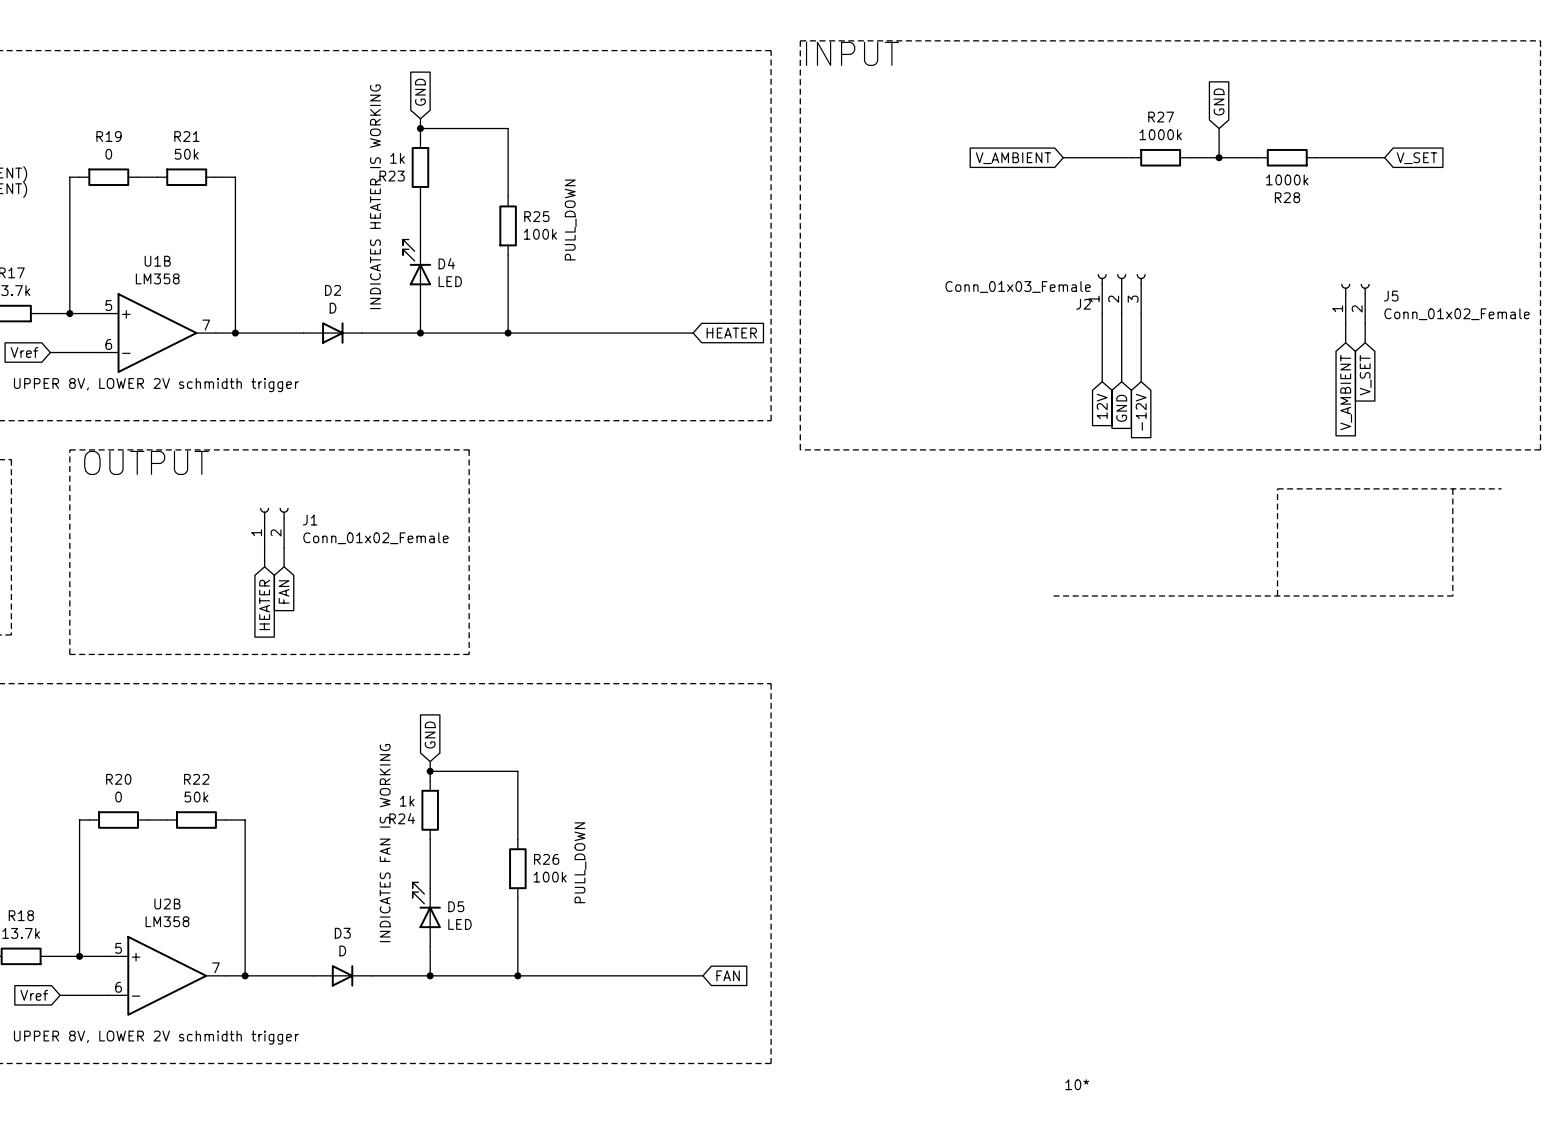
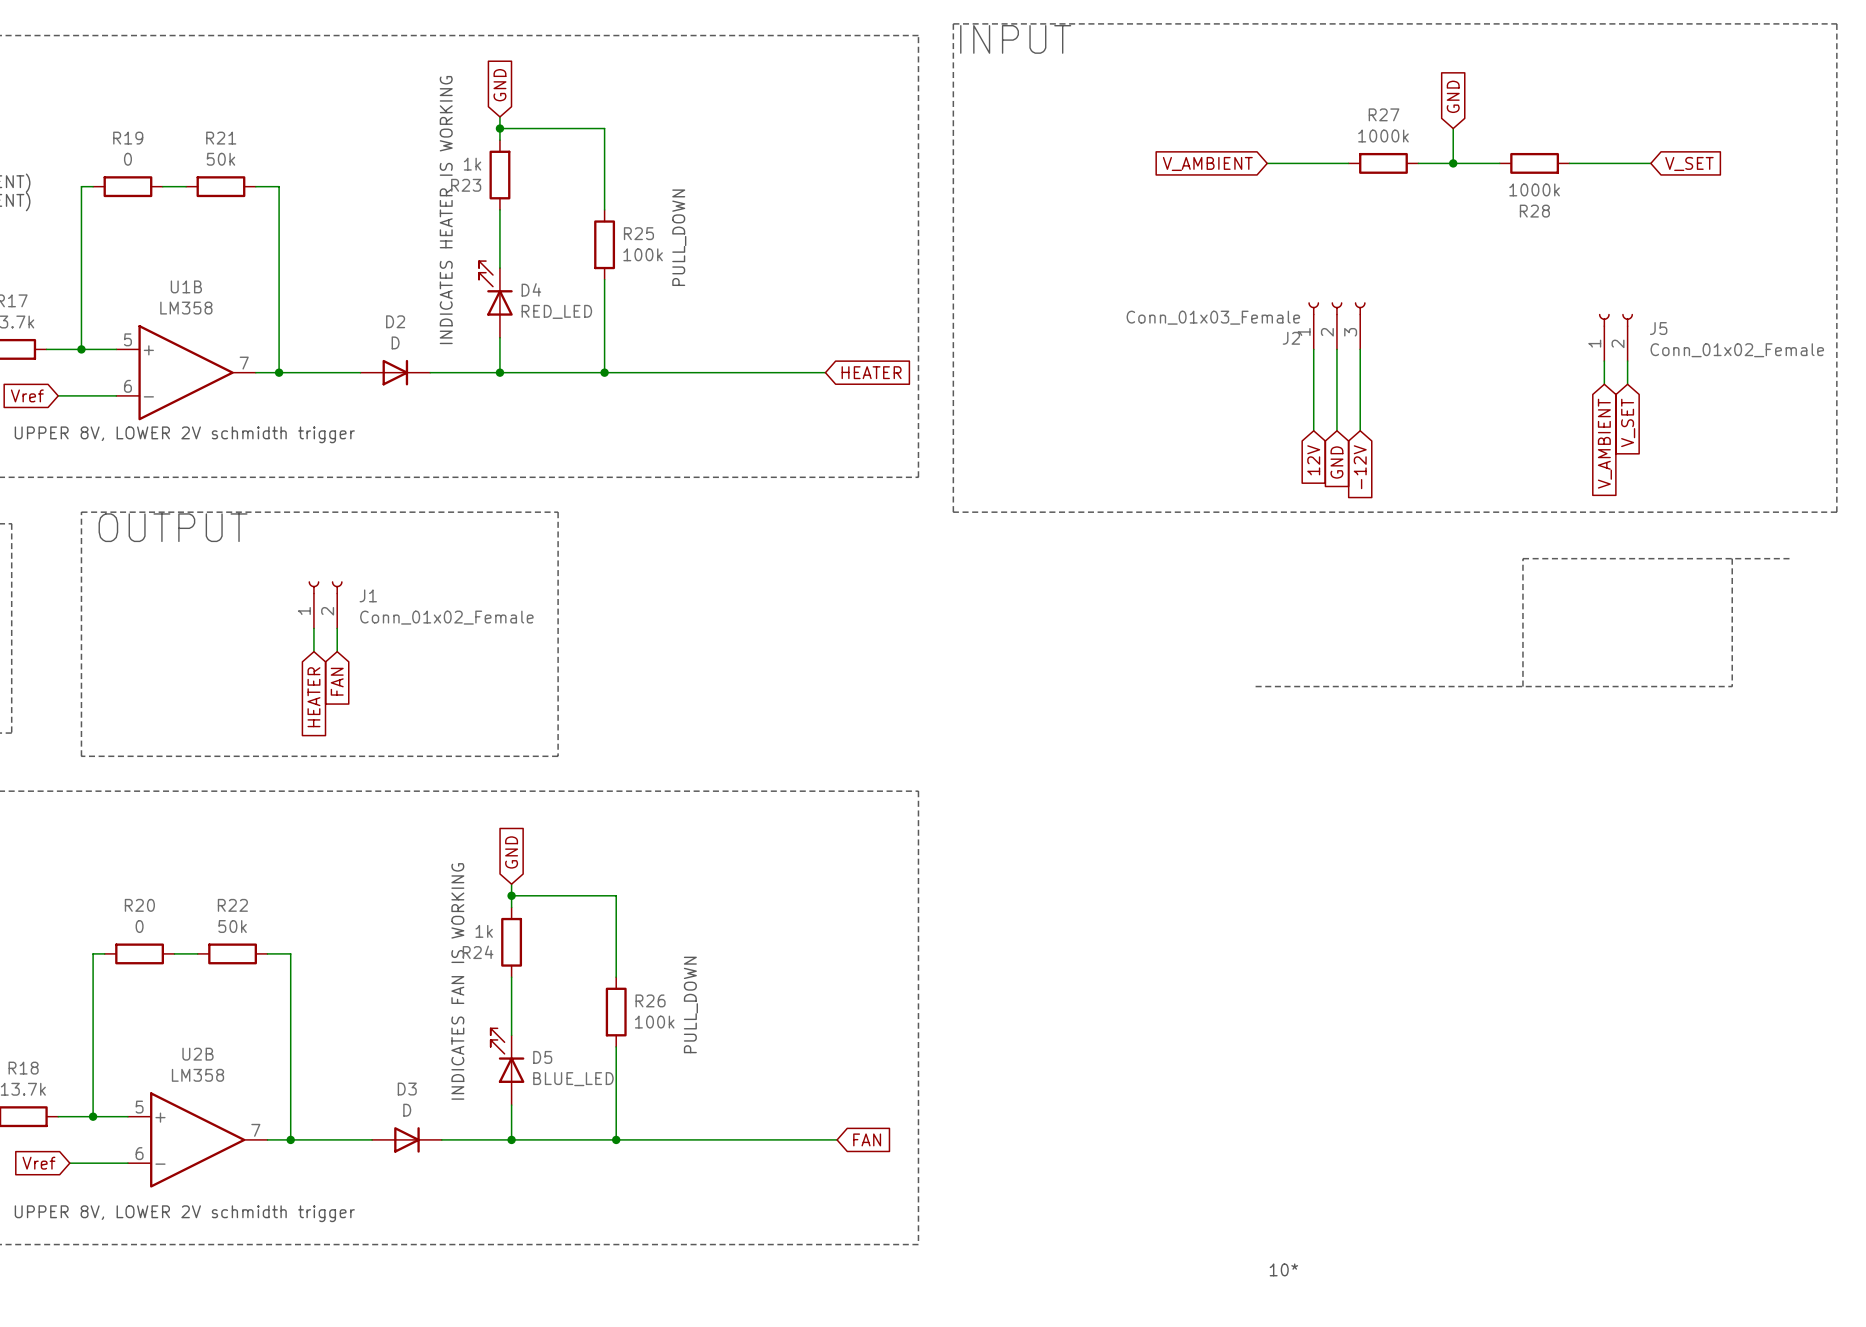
D4 value: LED (450, 281) -> RED_LED (556, 311)
D5 value: LED (459, 924) -> BLUE_LED (573, 1079)

